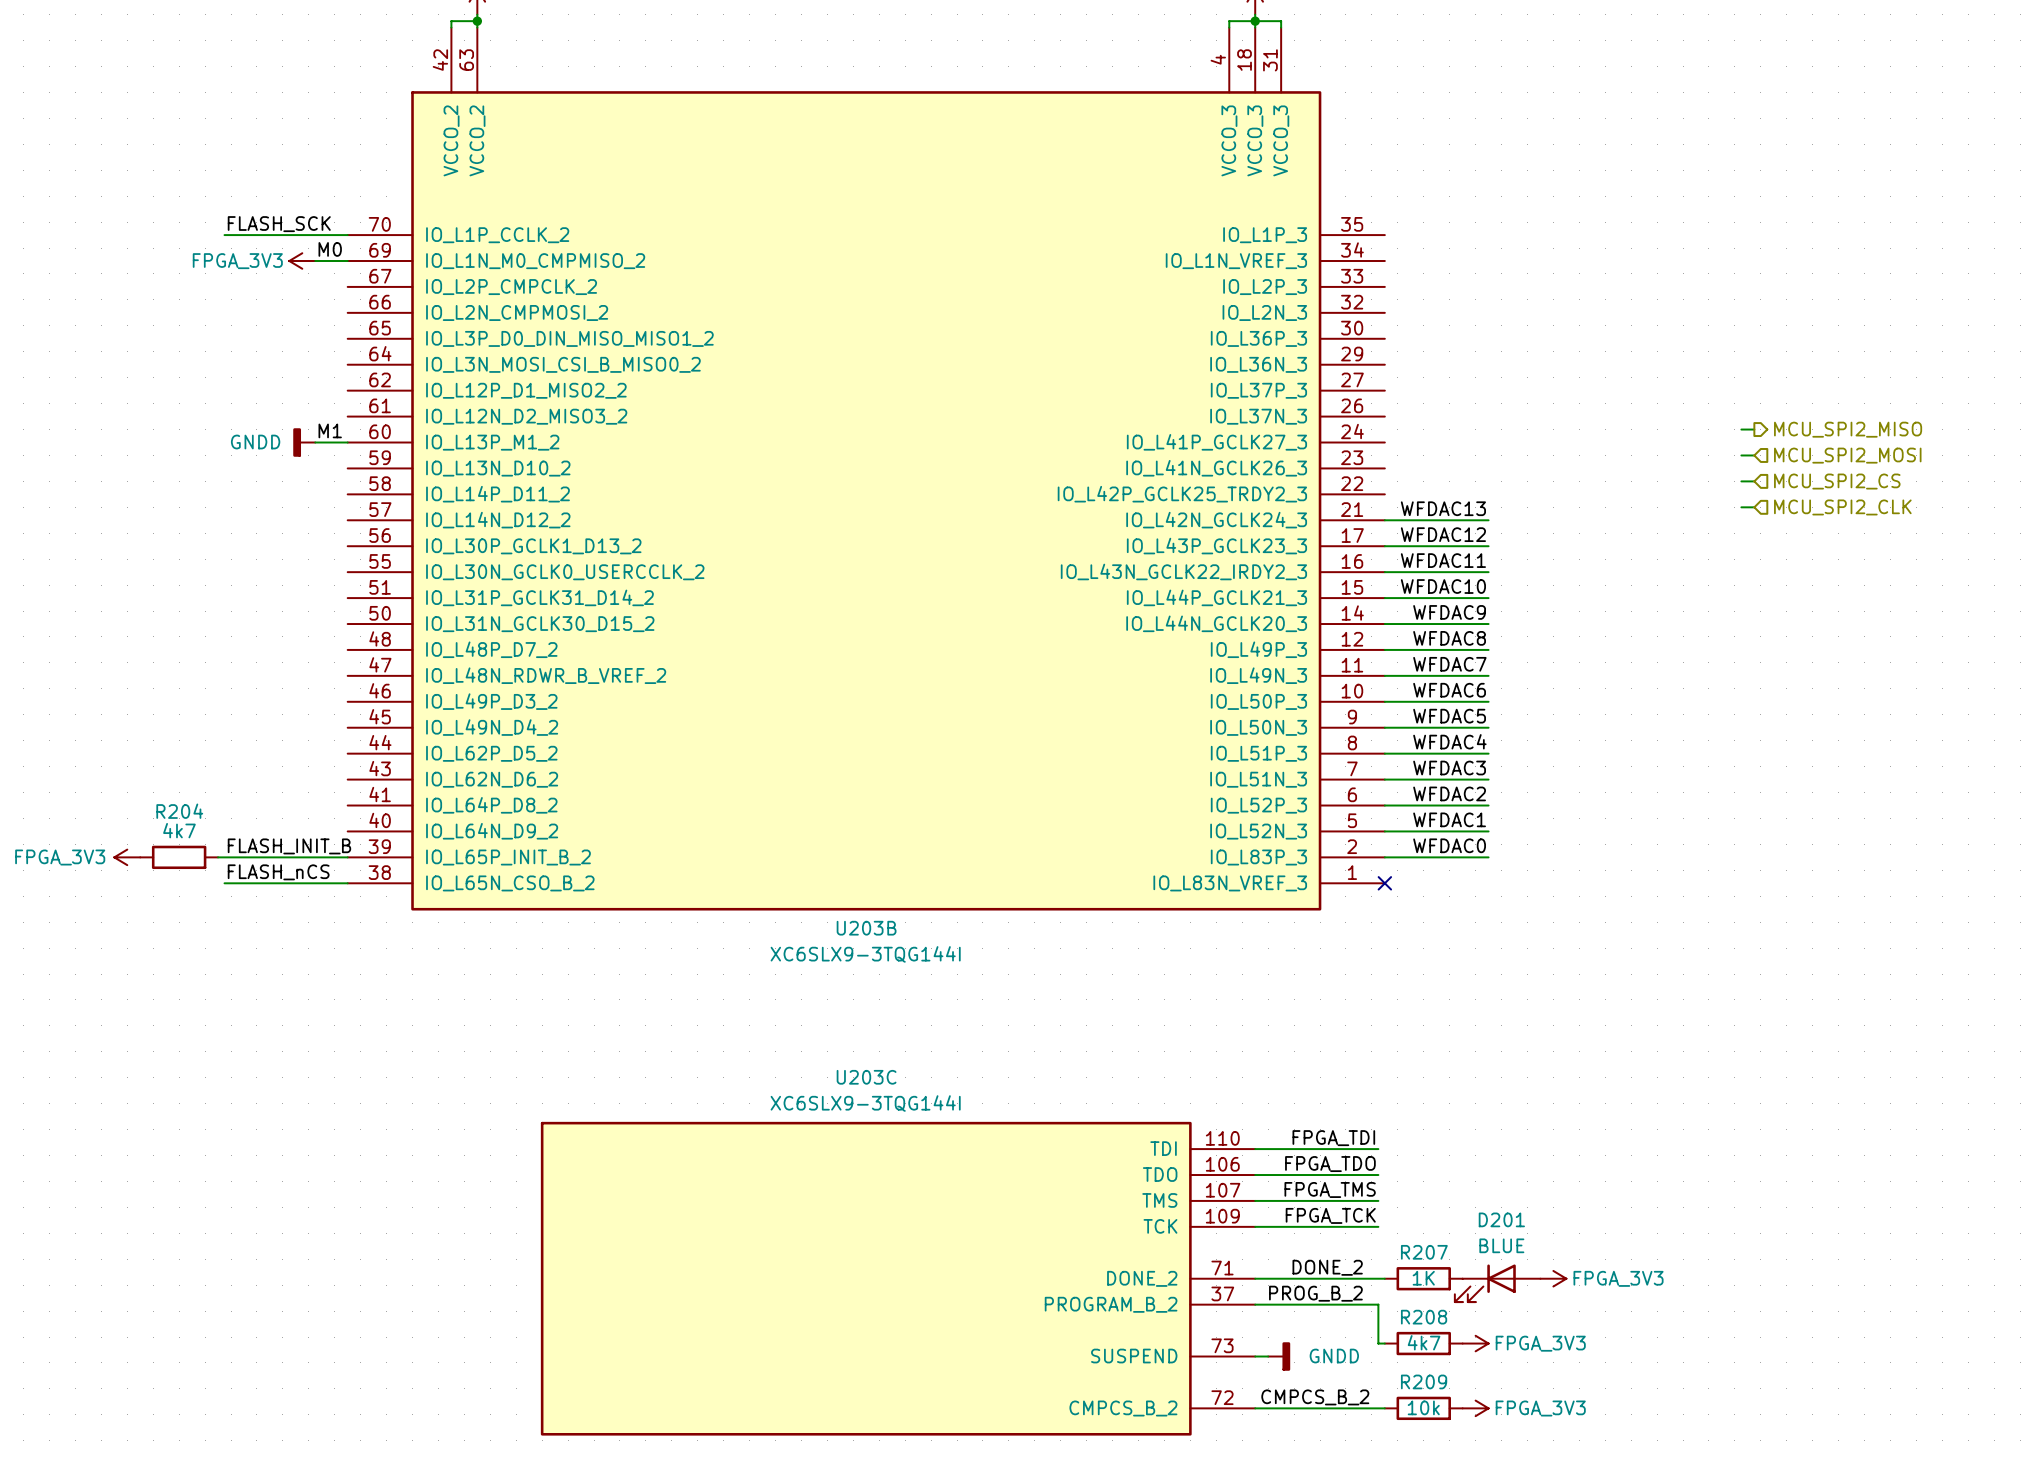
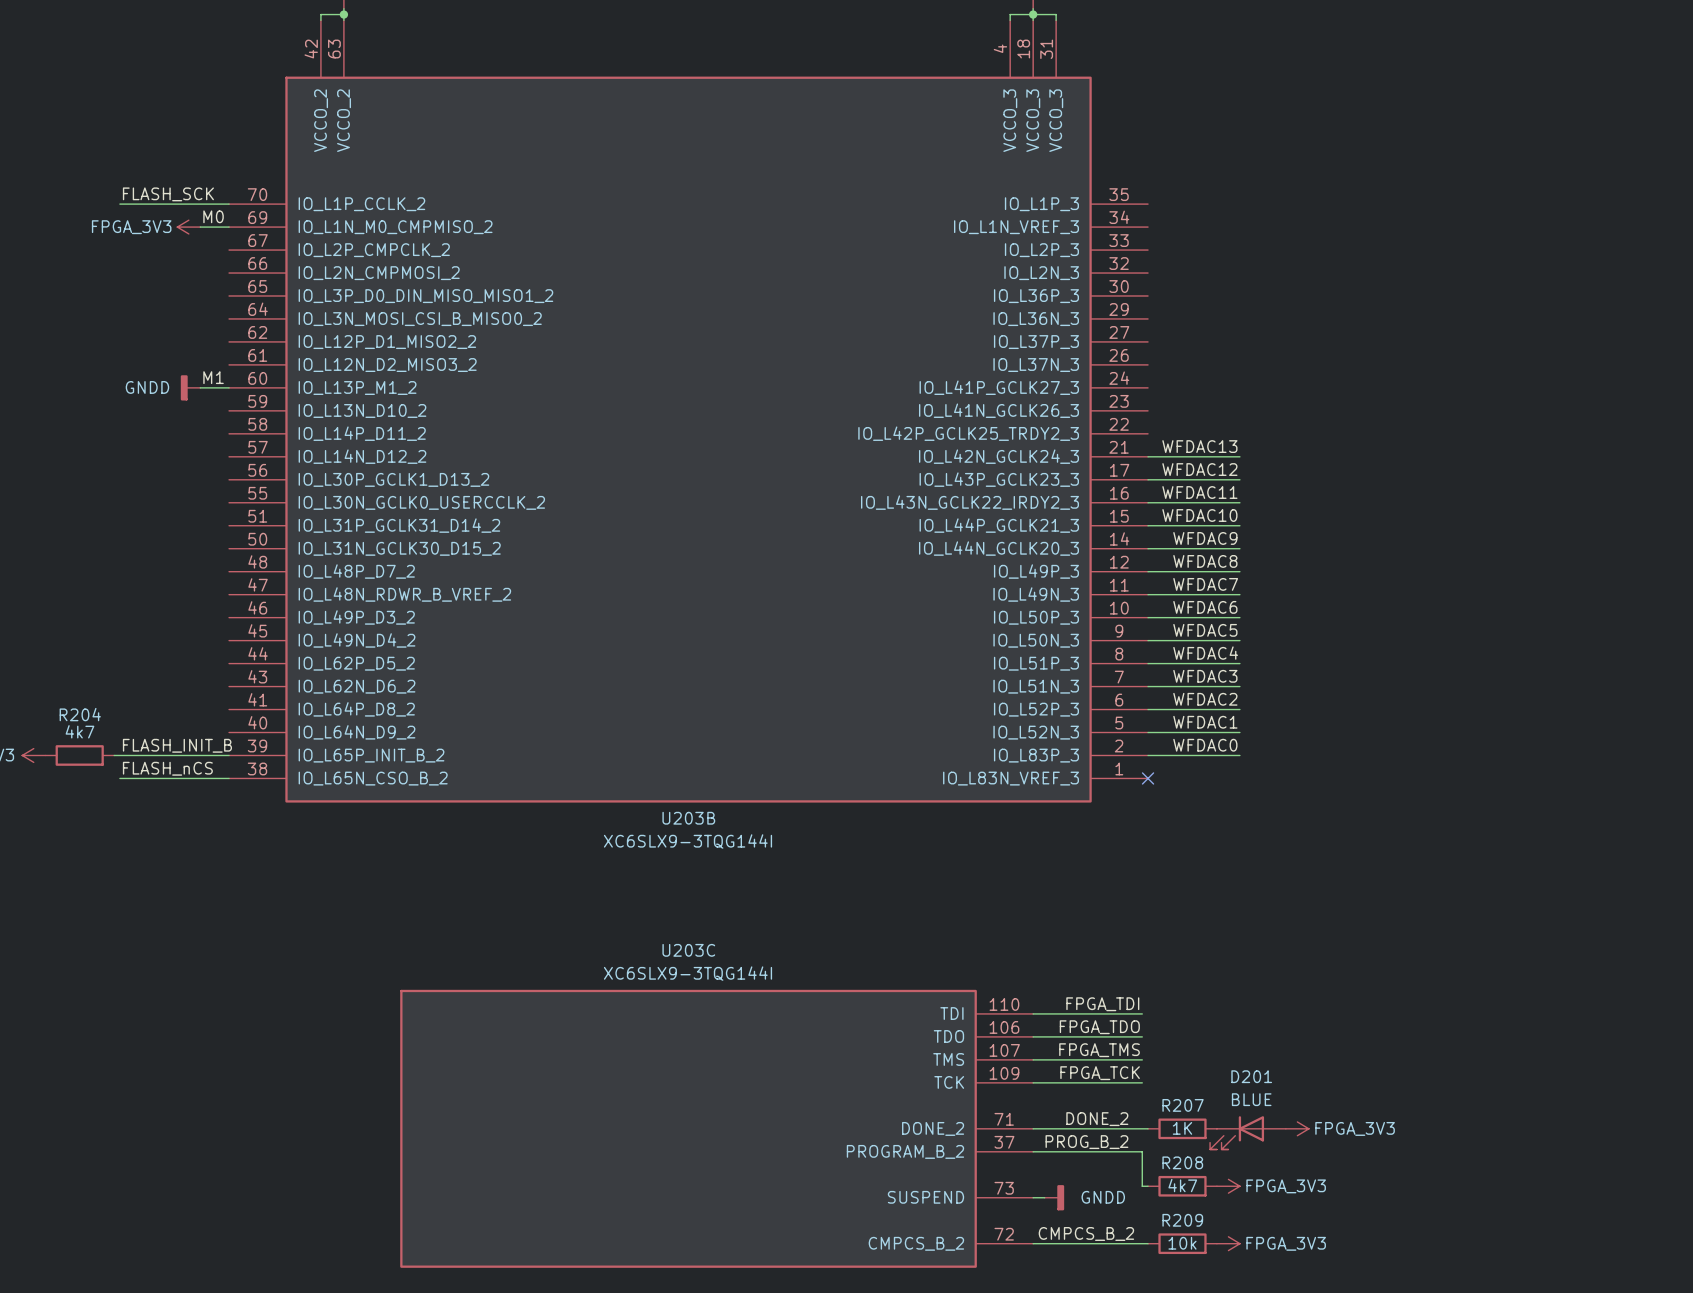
wire: (1741, 429) (1754, 429) -> none
hierarchical label: MCU_SPI2_MISO (1848, 429) -> none
wire: (1741, 455) (1754, 455) -> none
hierarchical label: MCU_SPI2_MOSI (1847, 455) -> none
wire: (1741, 481) (1754, 481) -> none
hierarchical label: MCU_SPI2_CS (1837, 481) -> none
wire: (1741, 507) (1754, 507) -> none
hierarchical label: MCU_SPI2_CLK (1842, 507) -> none

